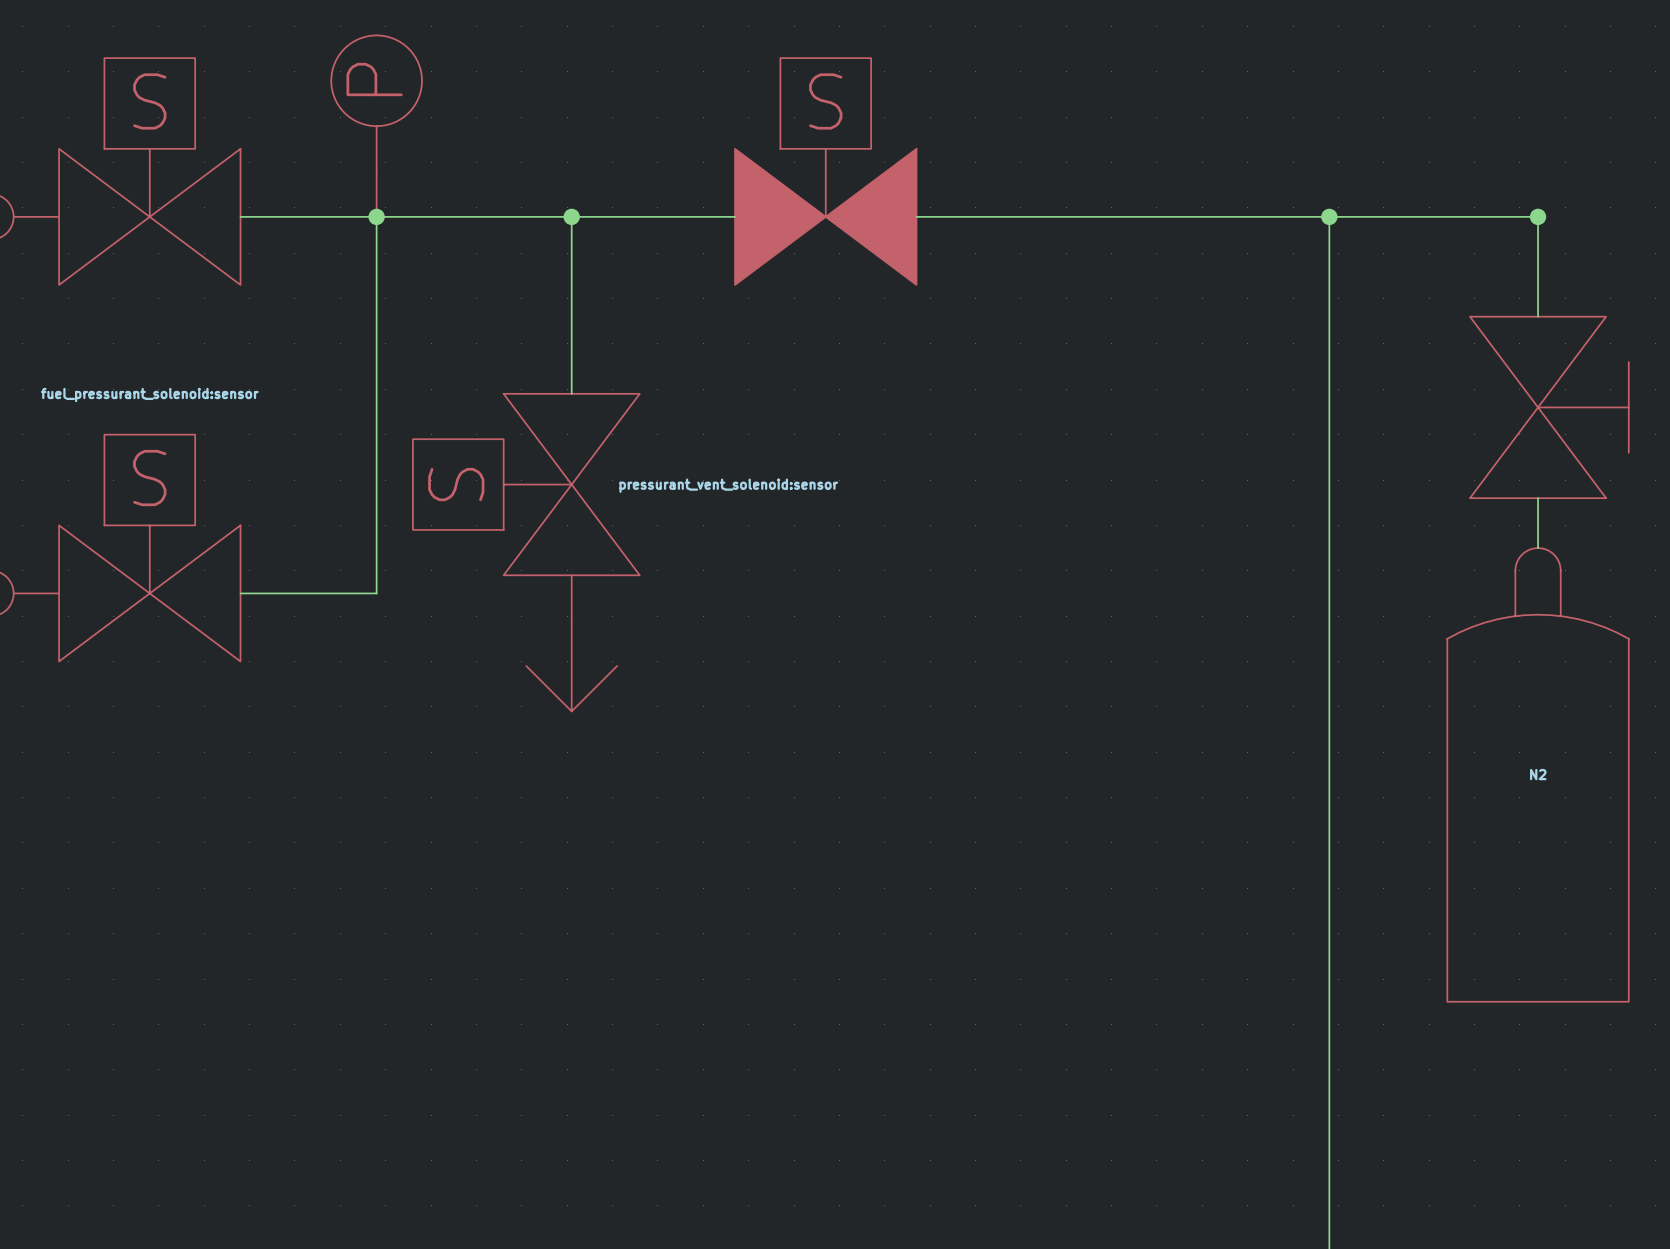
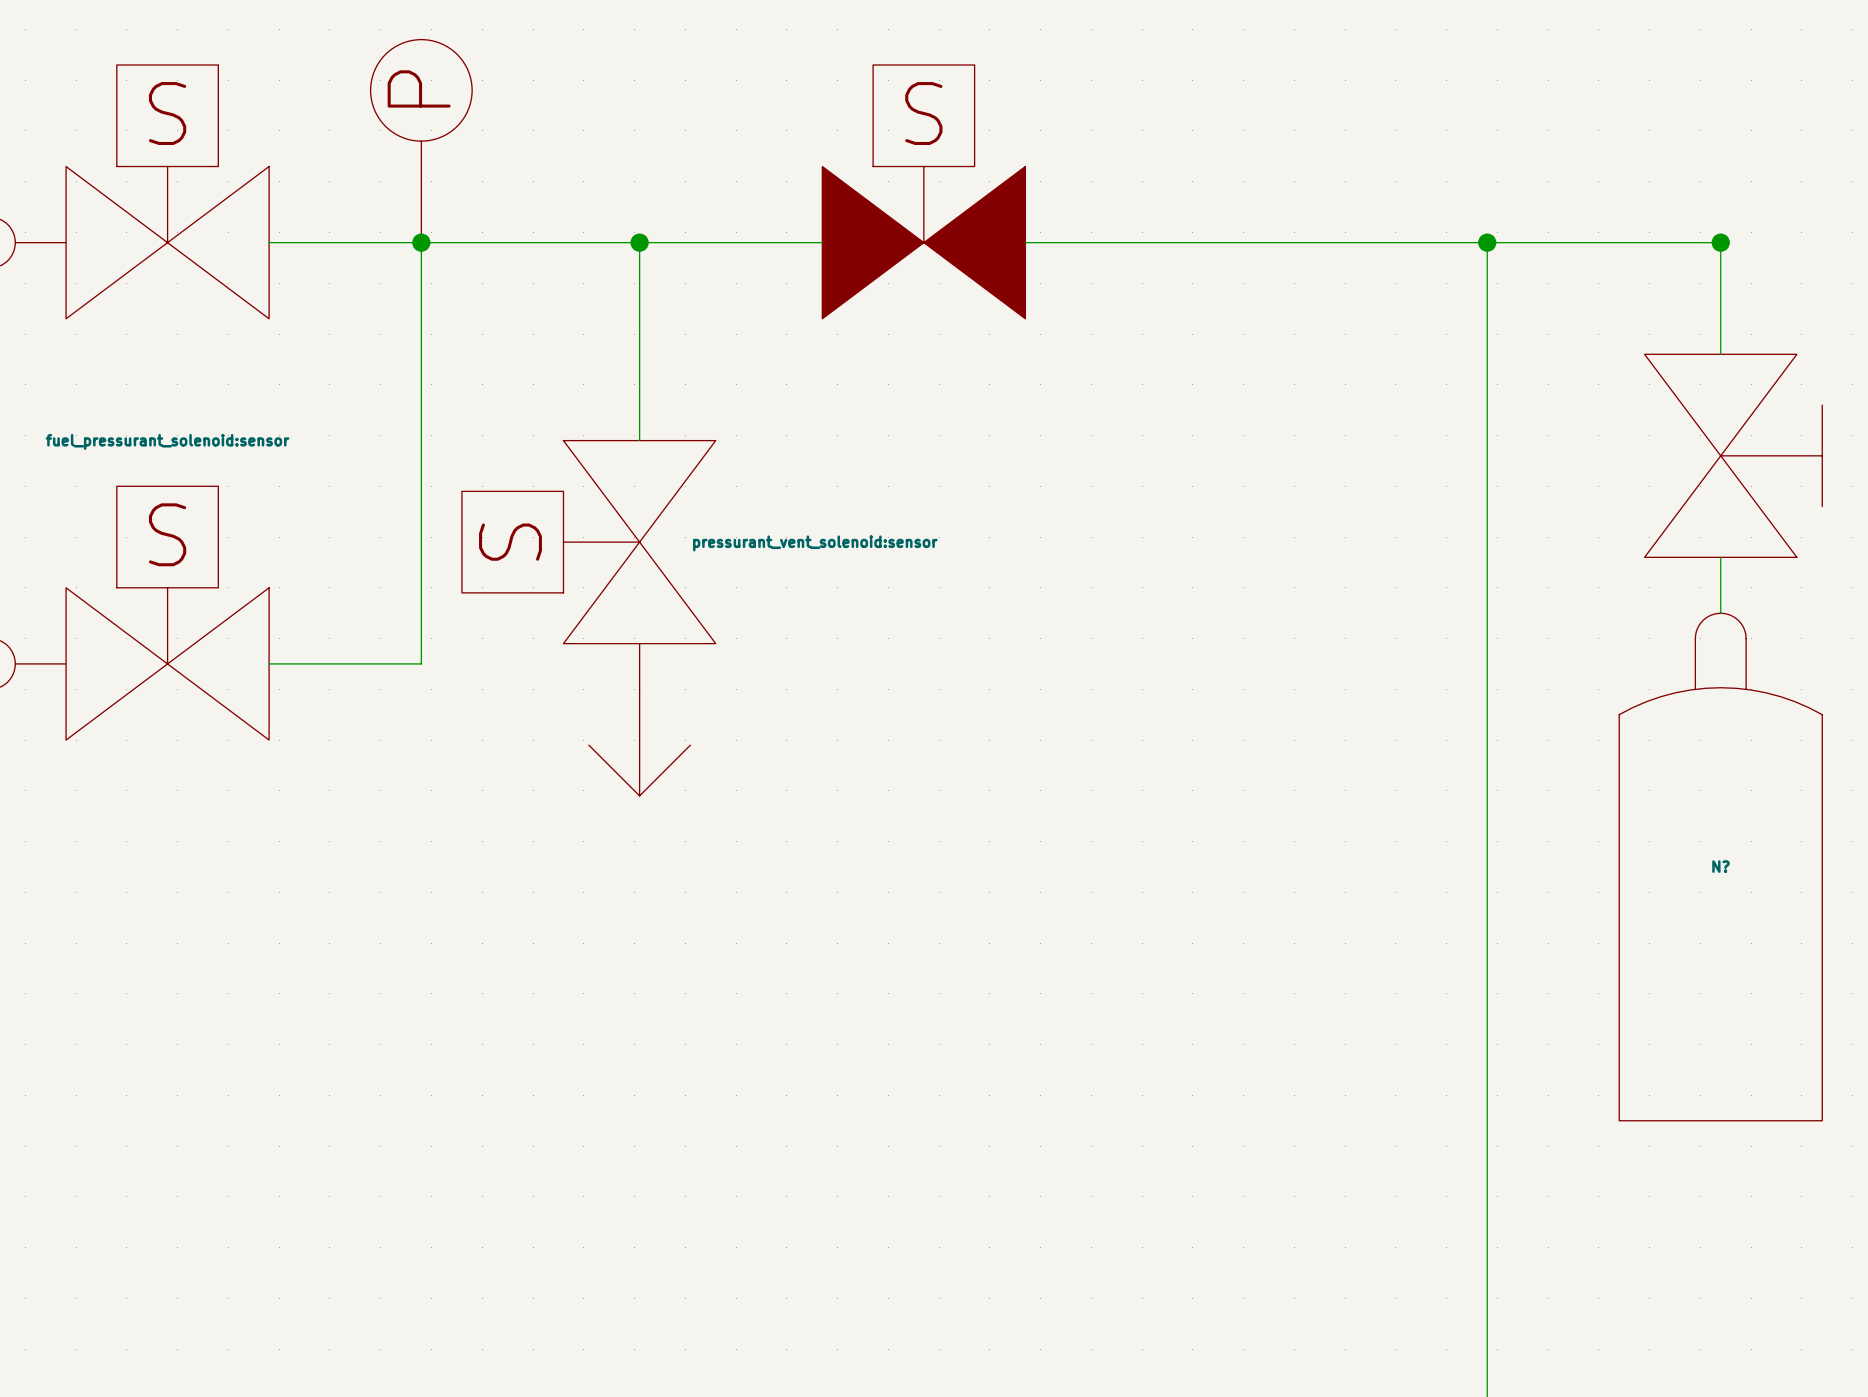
N2: (1538, 774) -> none
N?: none -> (1720, 867)

